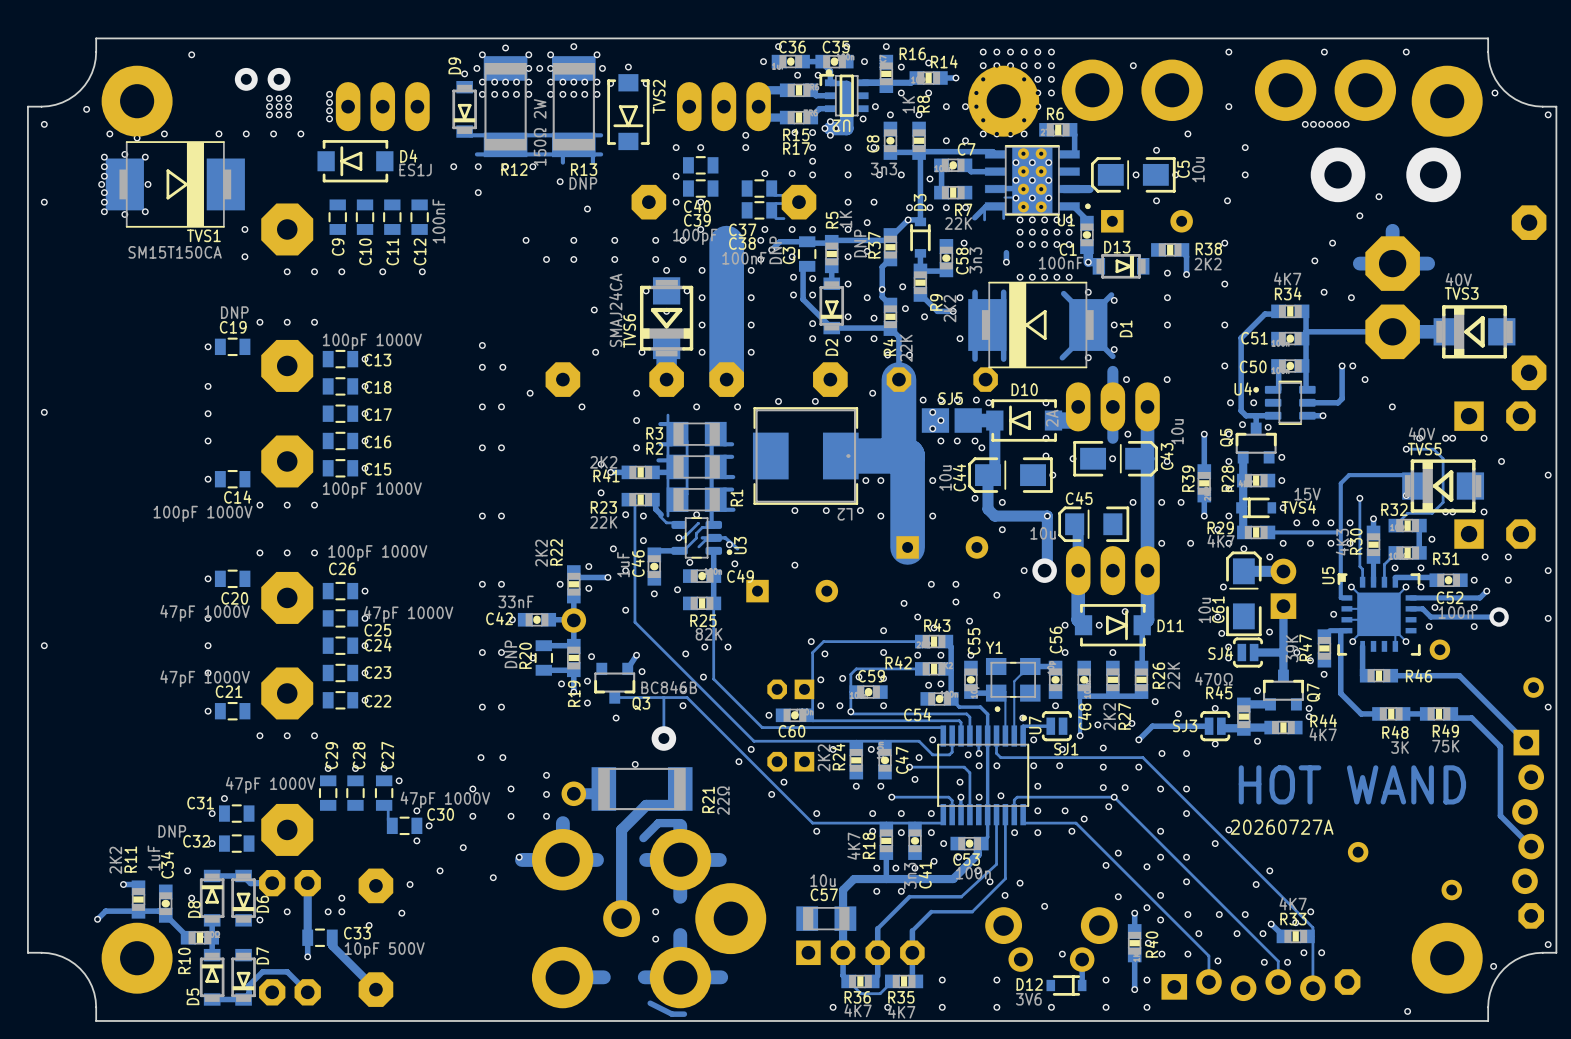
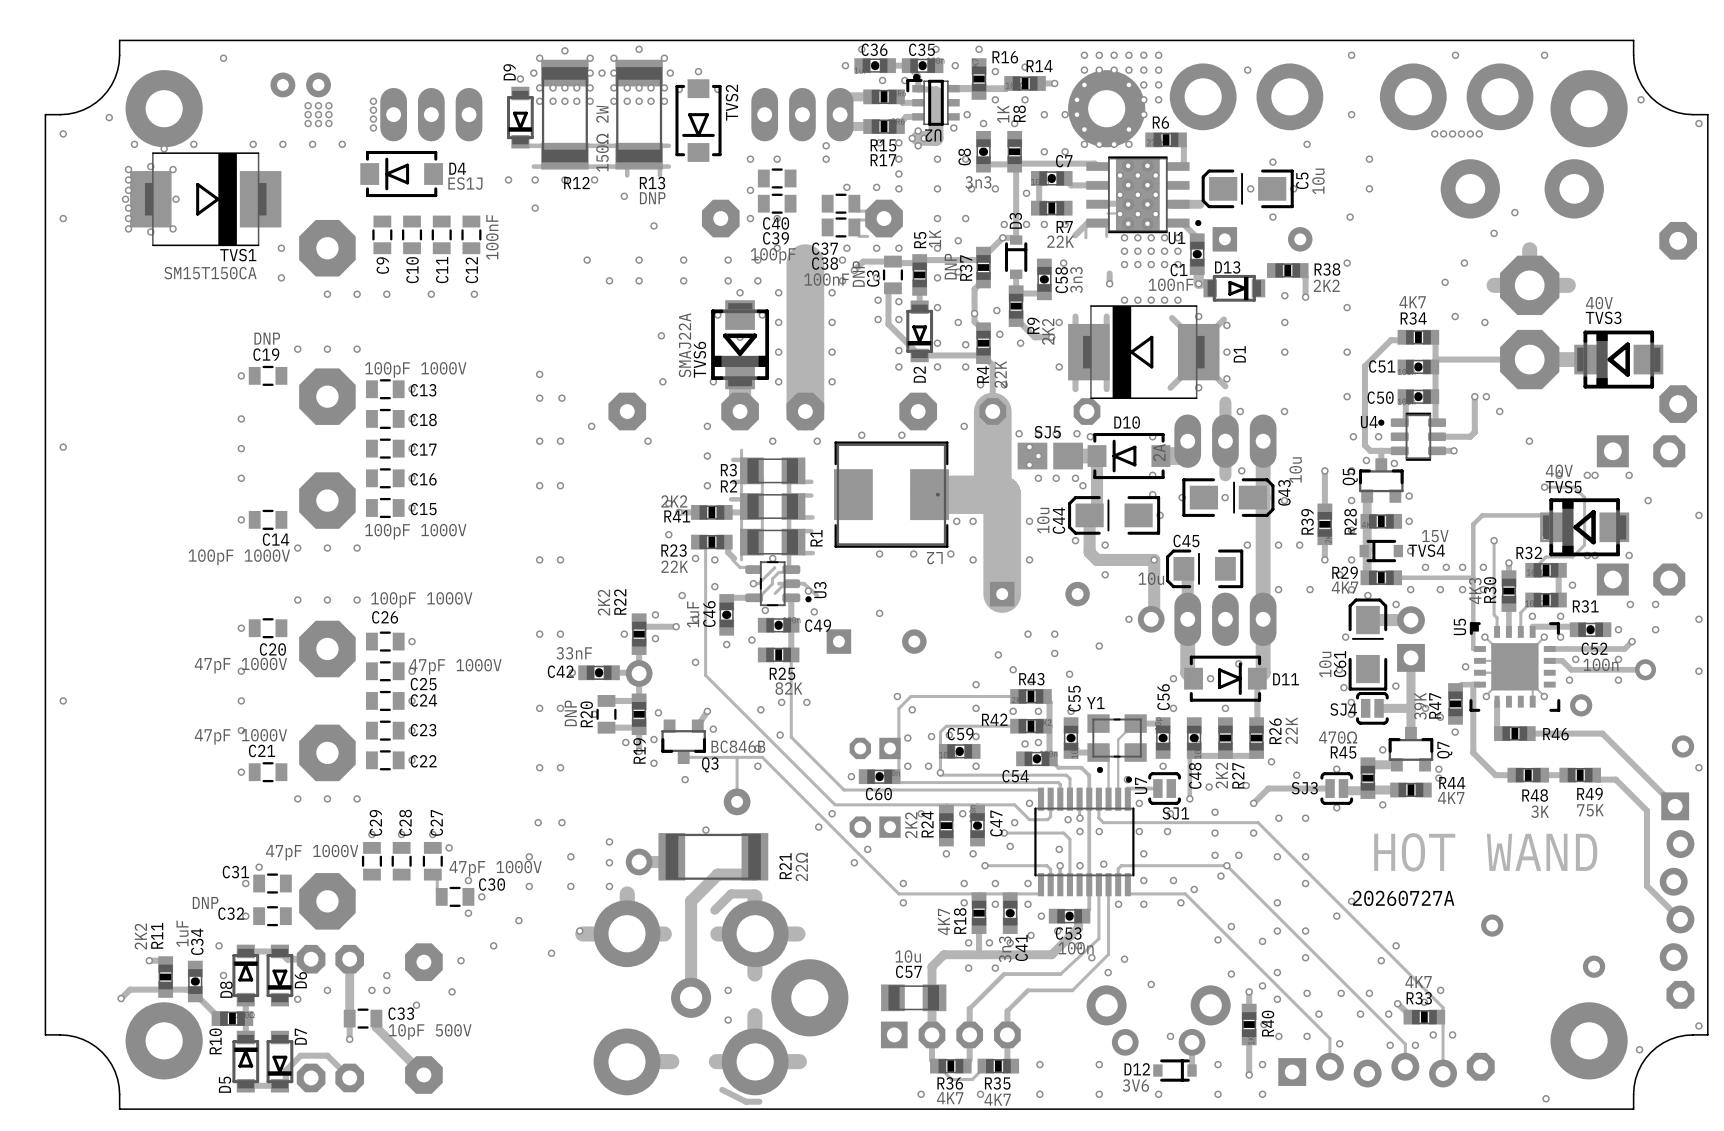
TVS6 value: SMAJ24CA (615, 310) -> SMAJ22A (685, 345)

